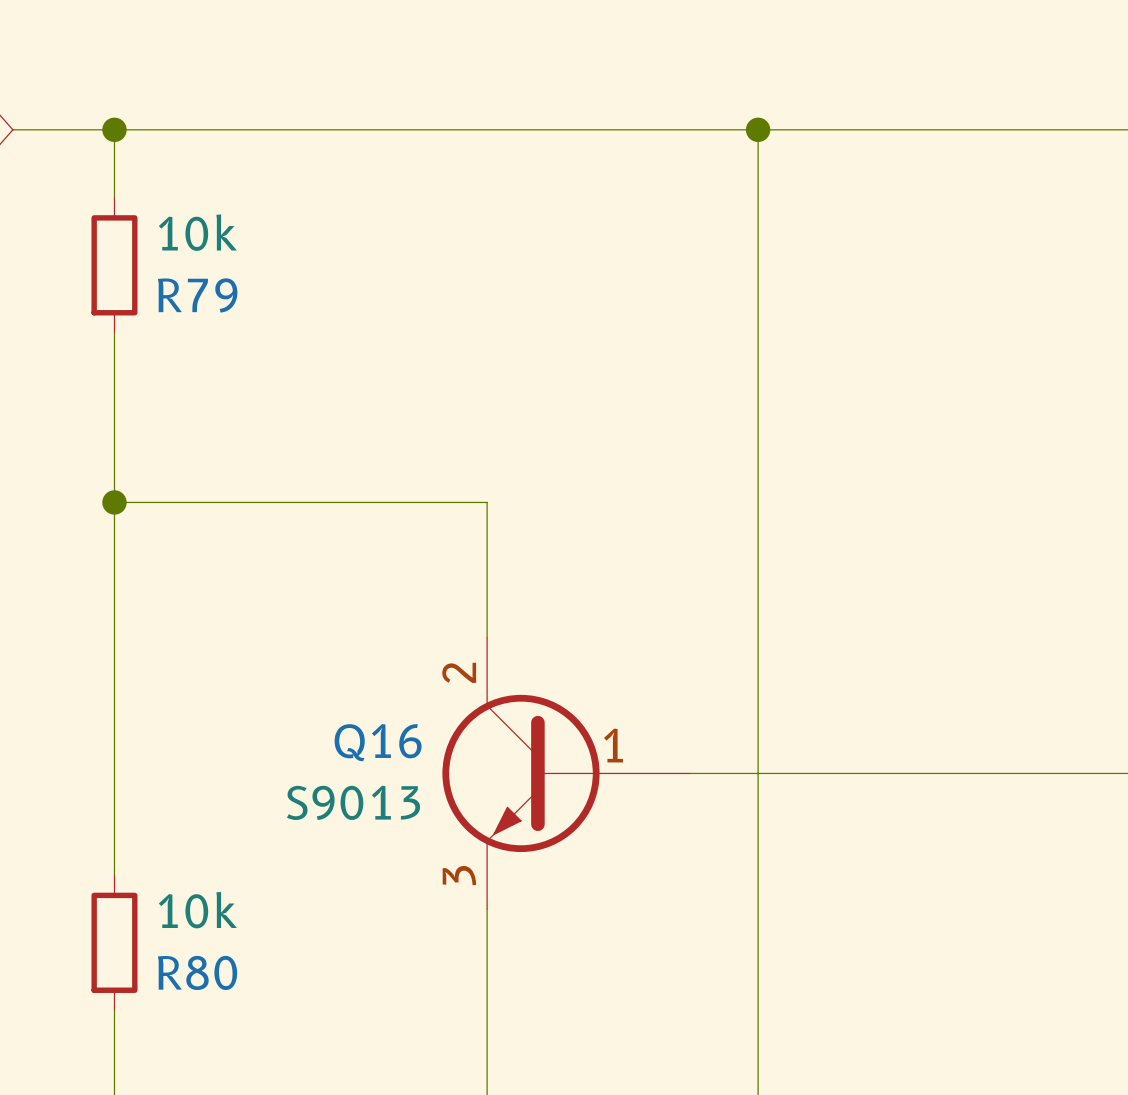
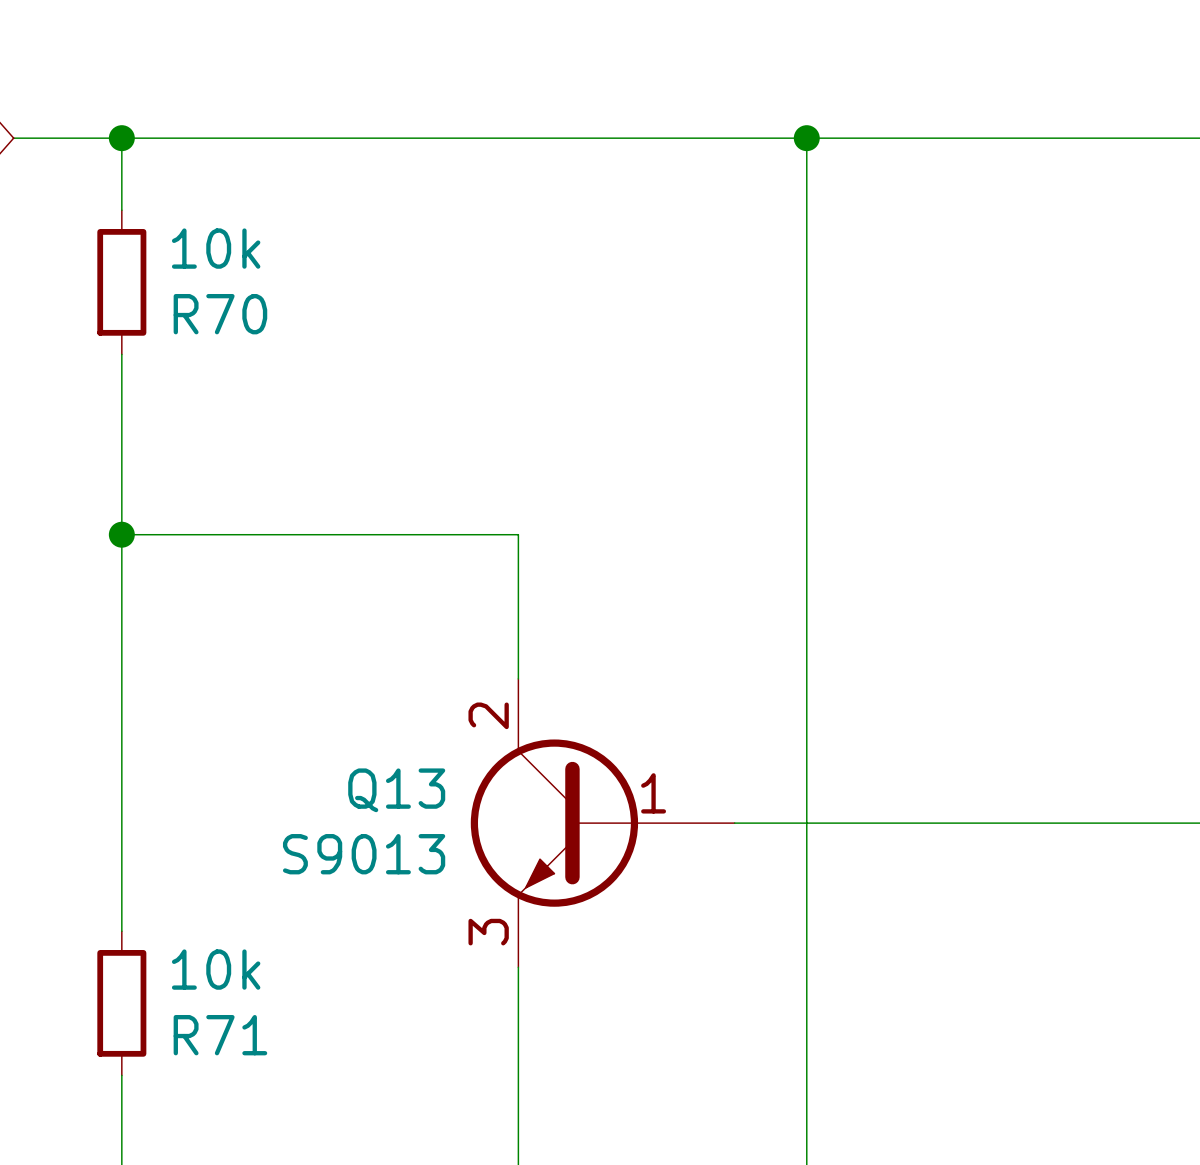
R79 name: R79 (197, 295) -> R70 (220, 314)
Q16 name: Q16 (378, 742) -> Q13 (396, 790)
R80 name: R80 (197, 972) -> R71 (220, 1035)

